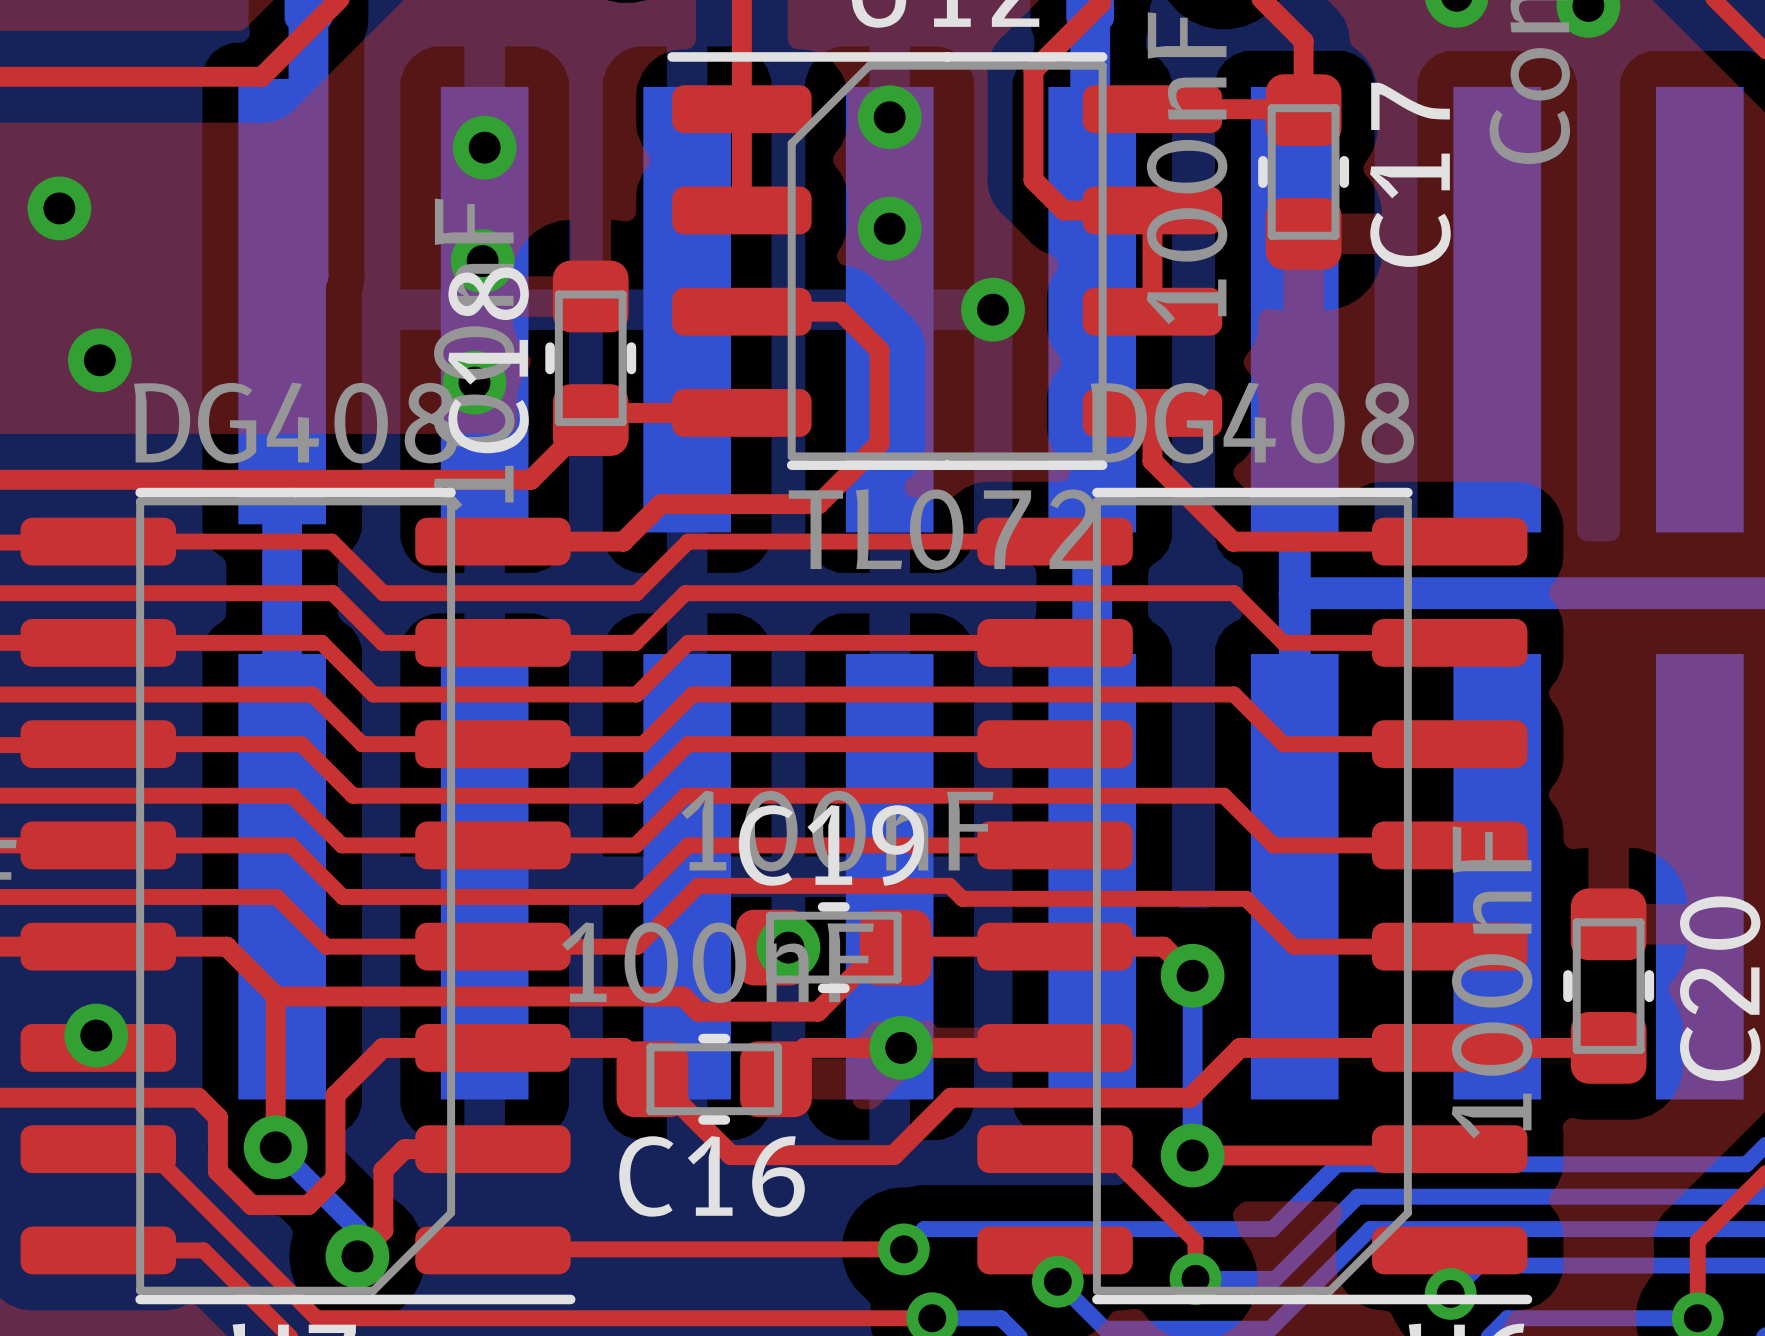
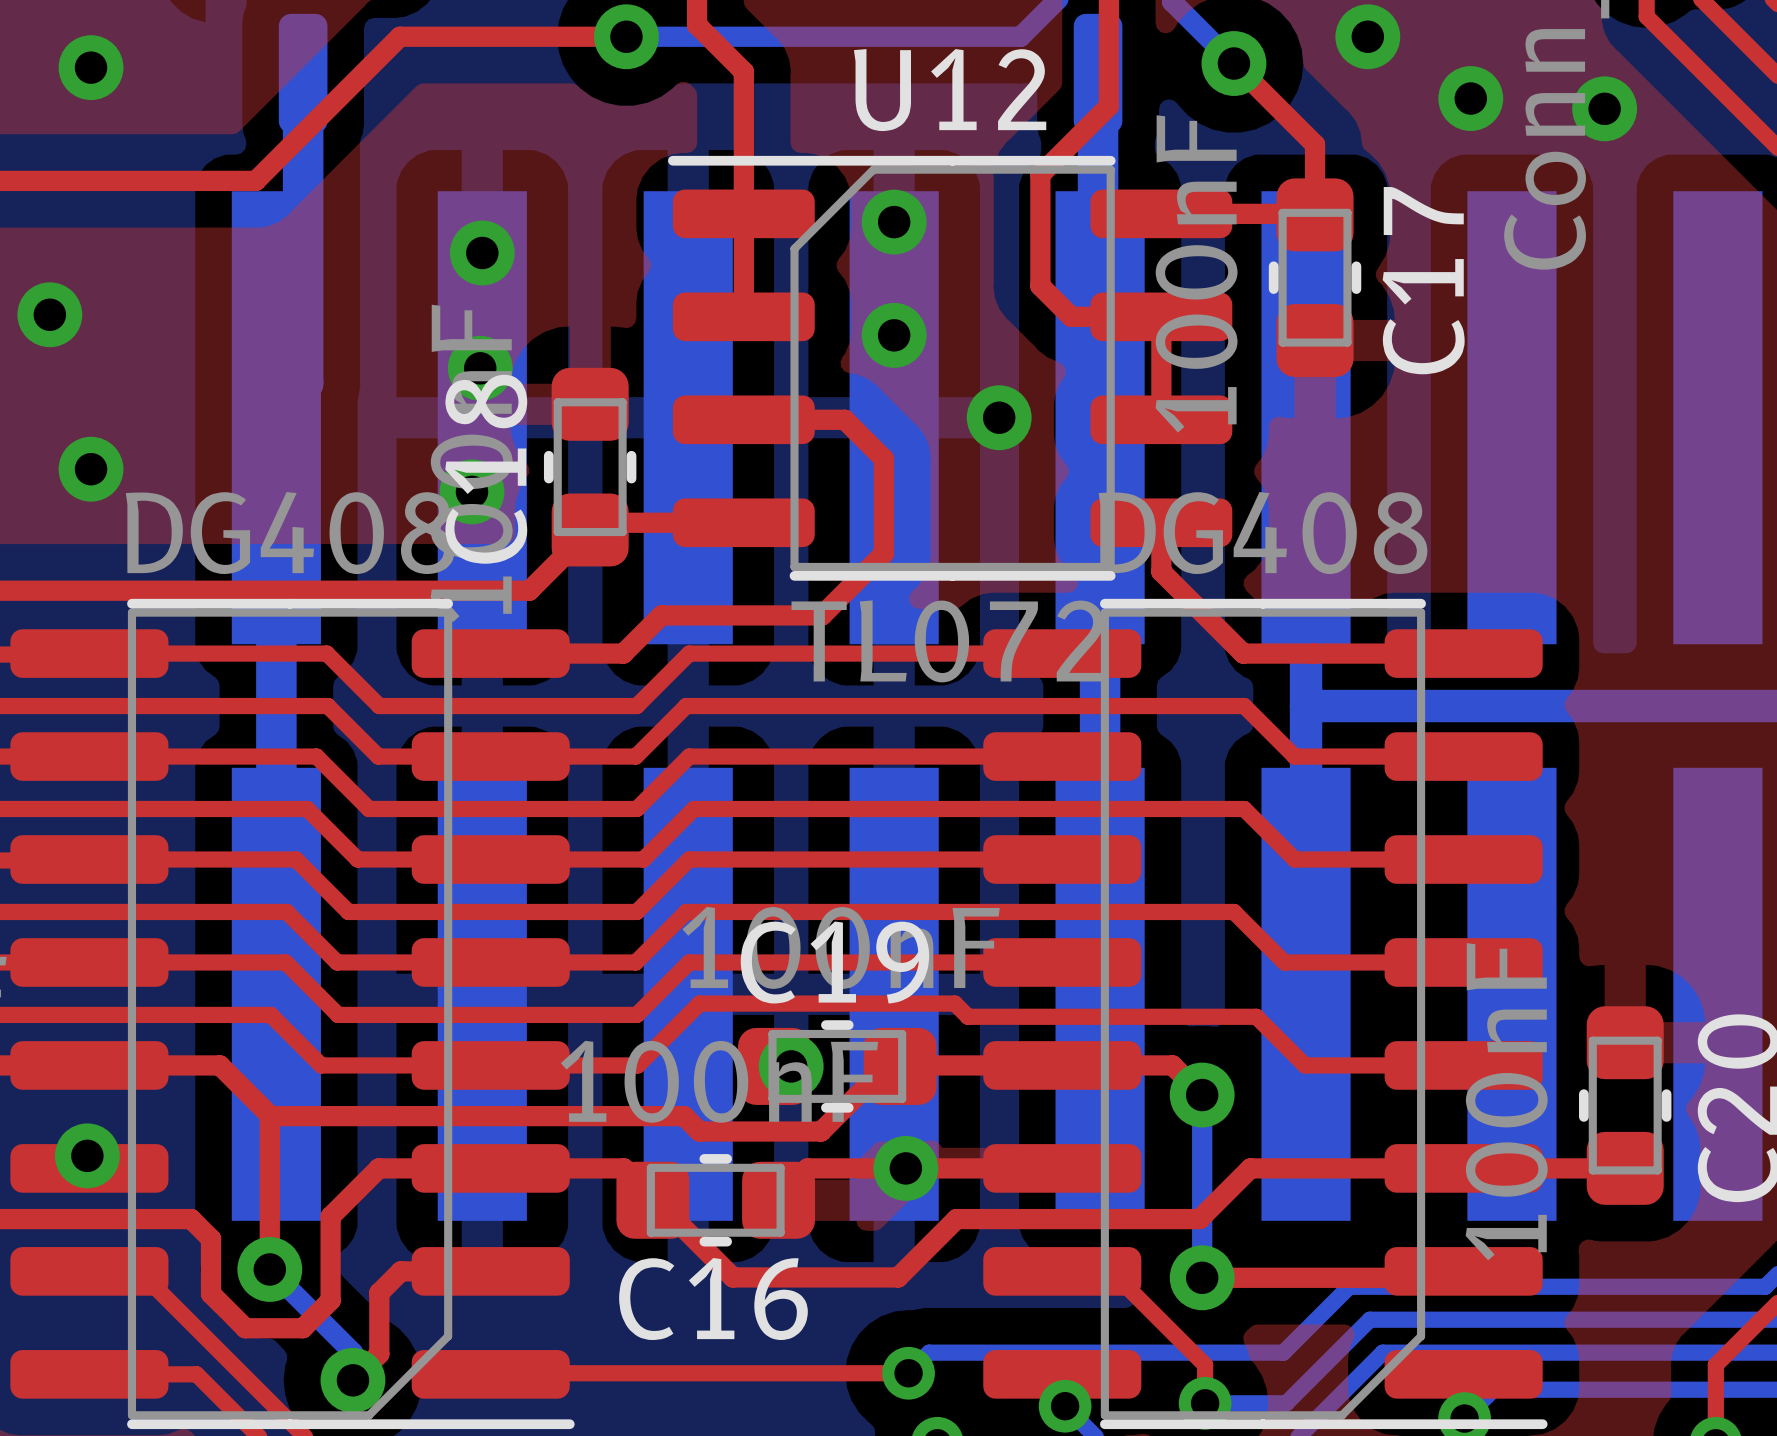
part footprint: [238, 78, 1744, 1100] -> [231, 191, 1763, 1221]

